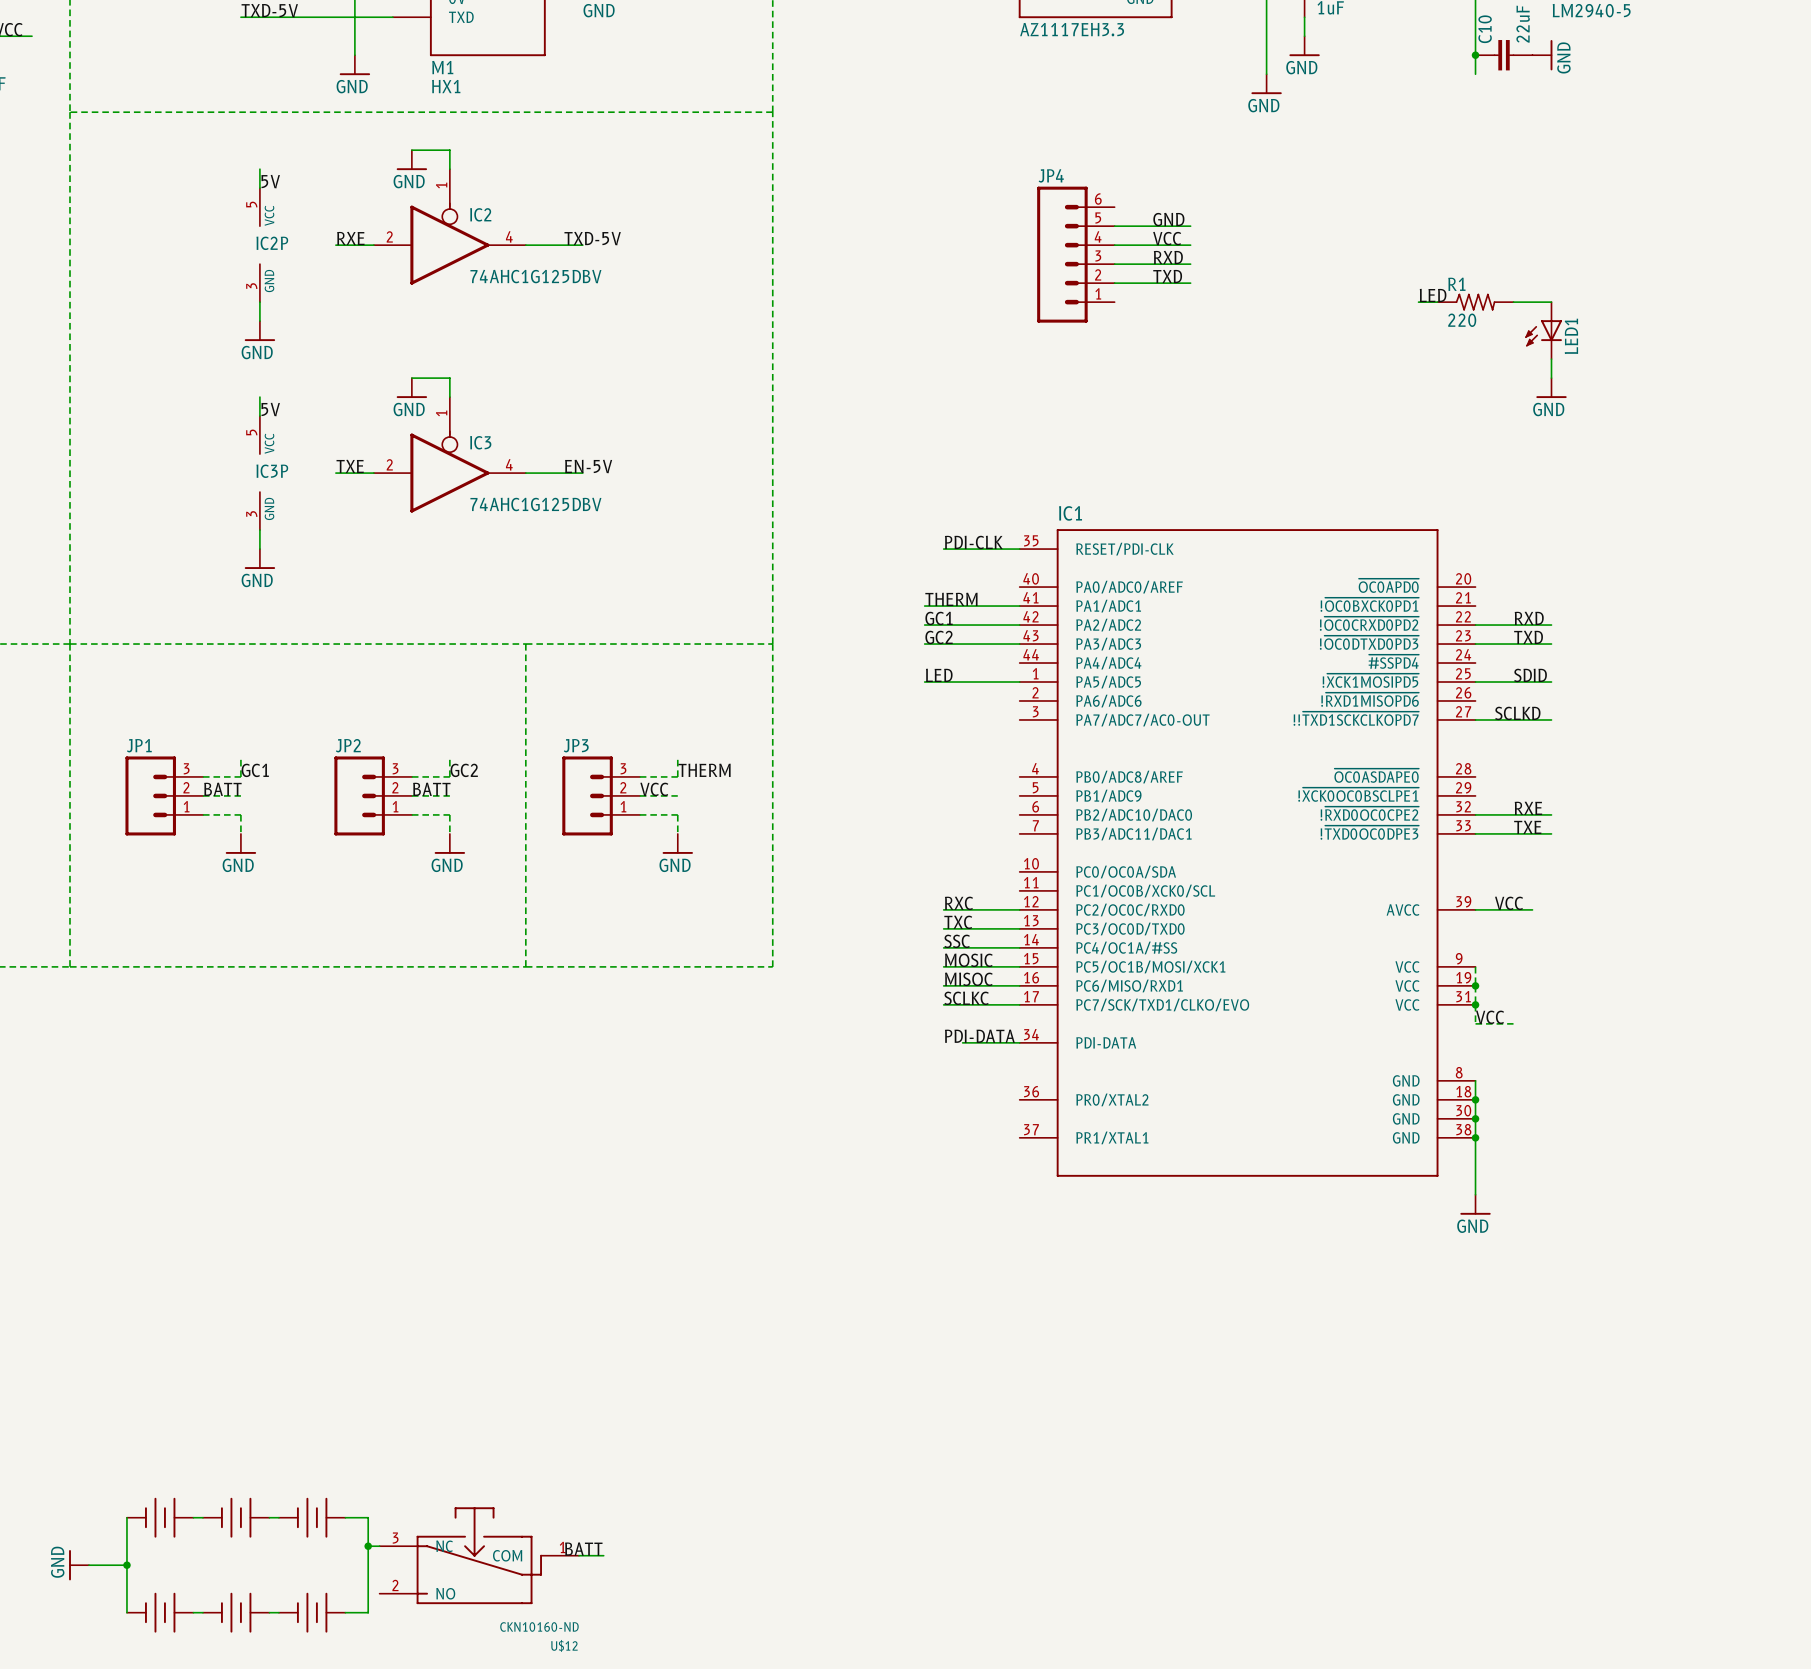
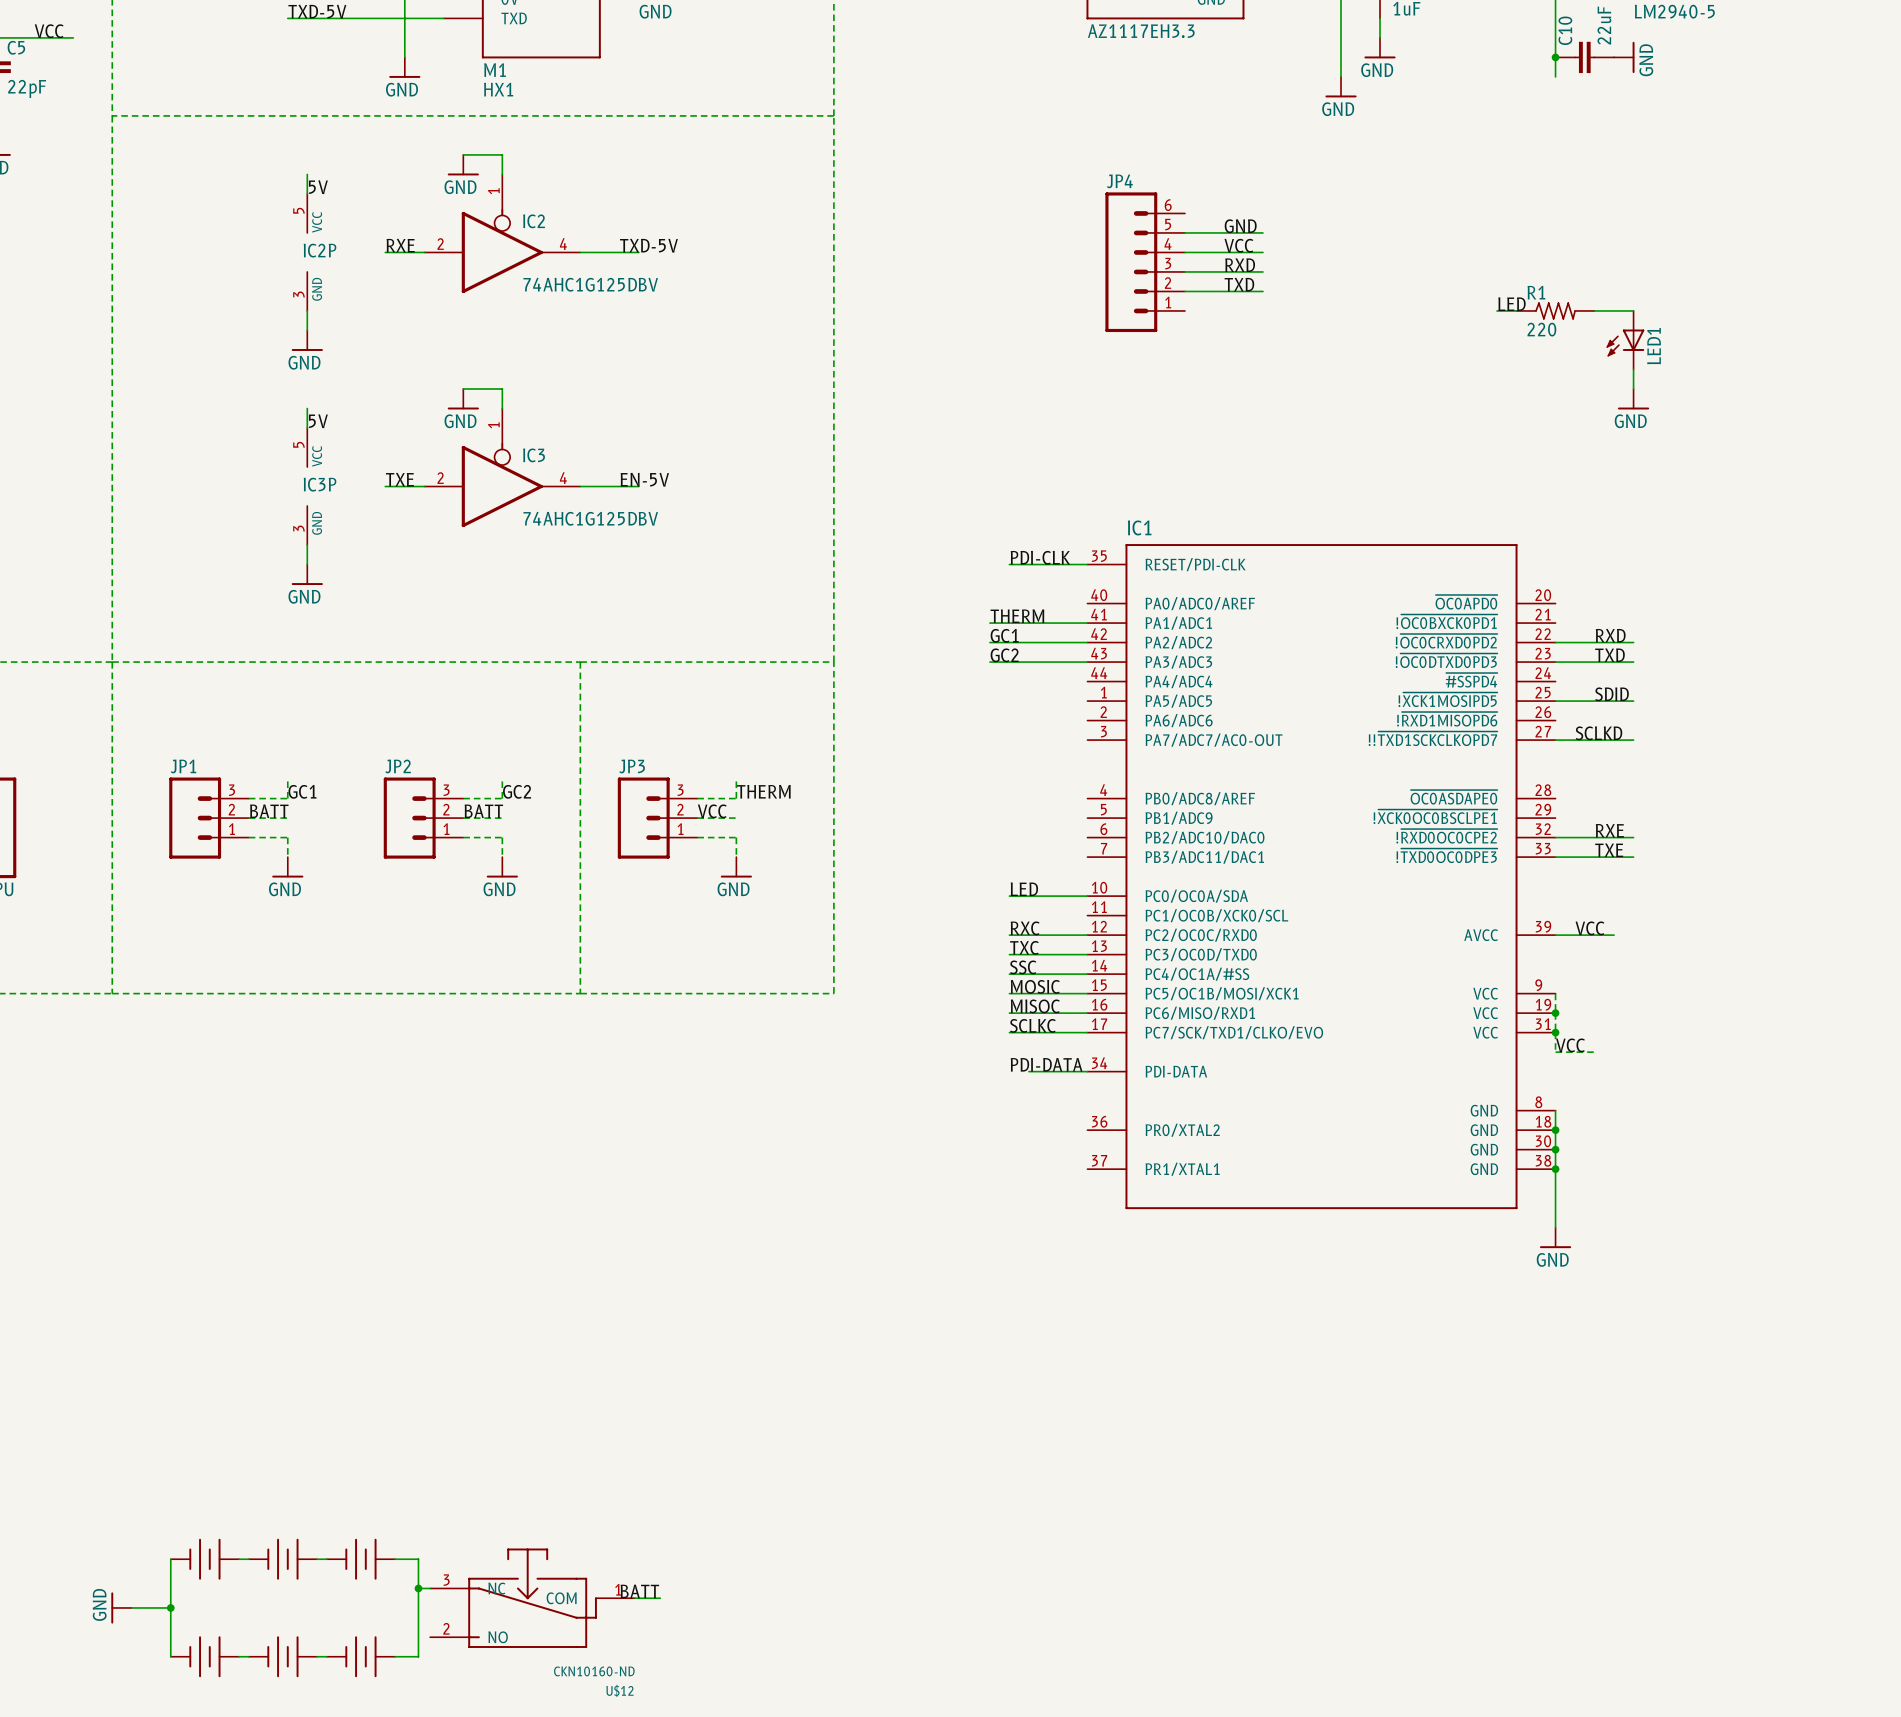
label: LED (939, 675) -> none
wire: (924, 682) (1019, 682) -> none
label: none -> LED (1024, 889)
wire: none -> (1009, 896) (1087, 896)

